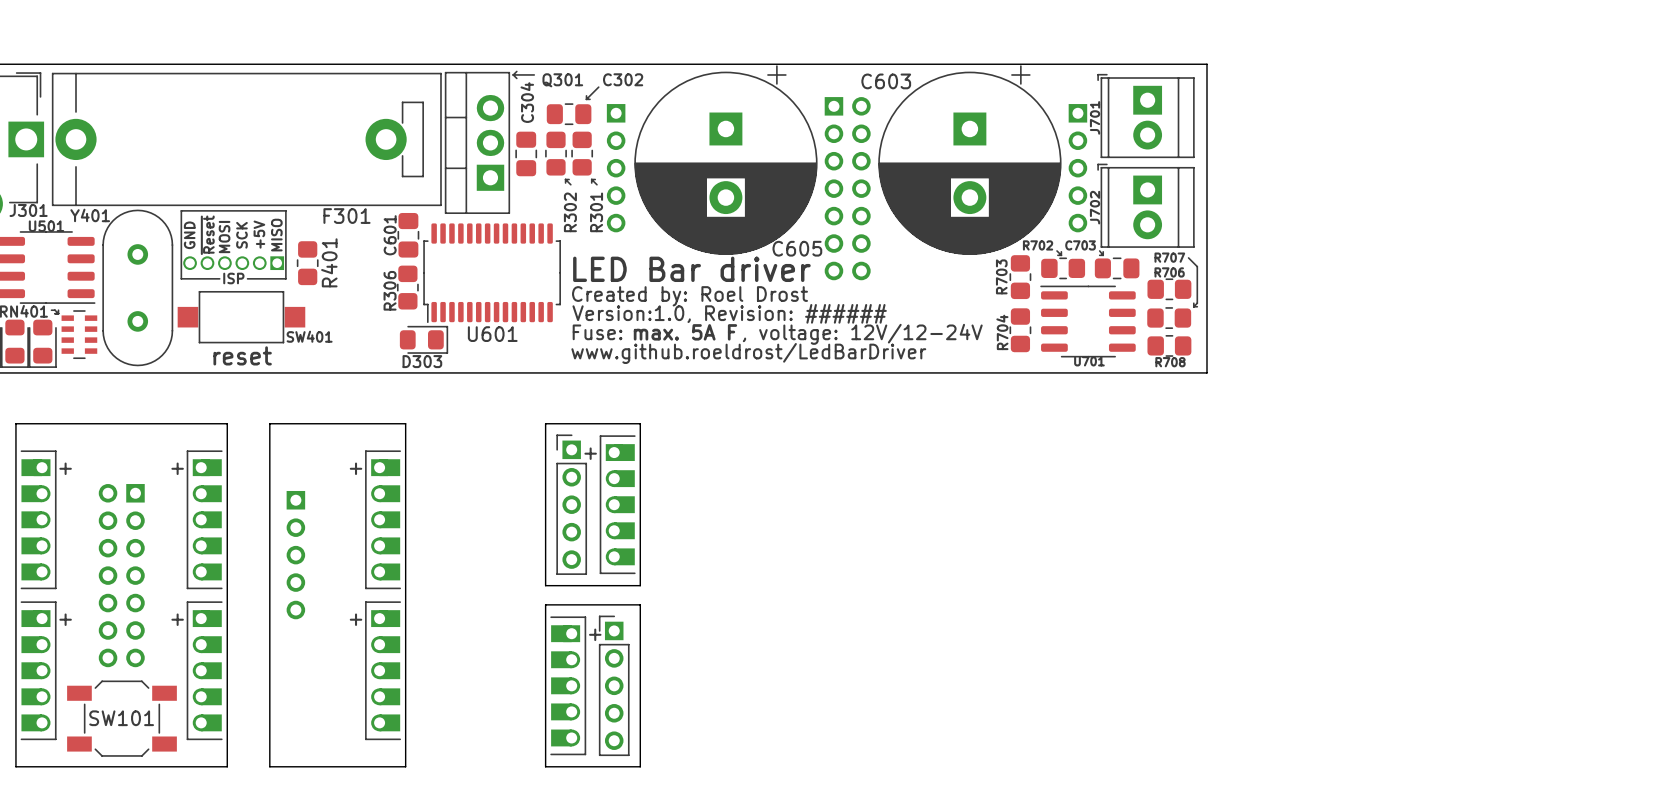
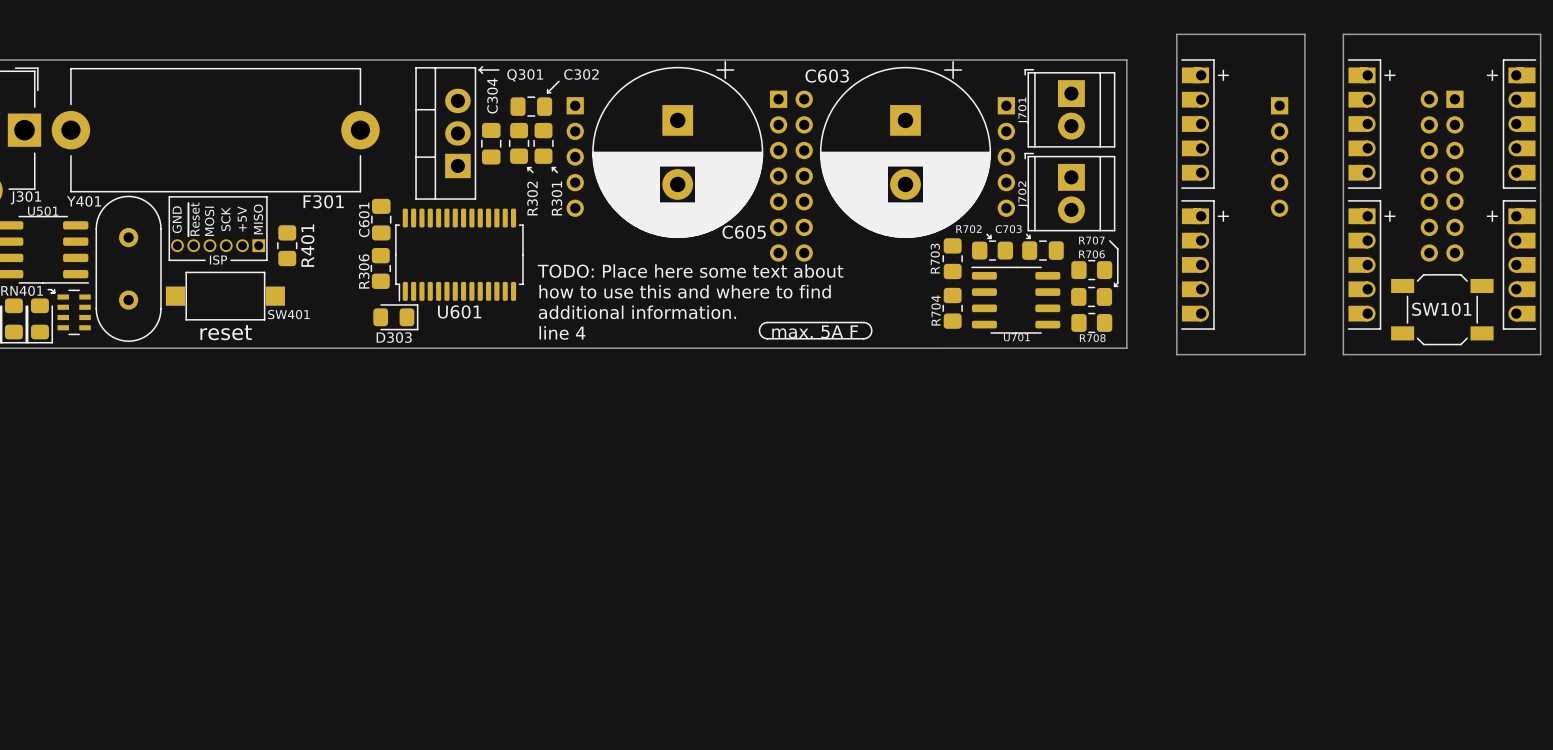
board edge: none -> (1176, 34) (1304, 34) (1304, 354) (1176, 354) (1176, 34)
board edge: none -> (1343, 34) (1540, 34) (1540, 354) (1343, 354) (1343, 34)
F301 footprint: [51, 72, 442, 207] -> [51, 67, 380, 193]
text: none -> + (1223, 75)
text: none -> + (1389, 75)
text: none -> + (1492, 75)
part: none -> (1197, 124)
part: none -> (1364, 124)
part: none -> (1519, 124)
part: none -> (1279, 157)
part: none -> (1442, 176)
text: none -> + (1223, 216)
text: none -> + (1389, 216)
text: none -> + (1492, 216)
text: LED Bar driver (691, 269) -> none
part: none -> (1197, 264)
part: none -> (1364, 264)
part: none -> (1519, 264)
text: Created by: Roel Drost (690, 296) -> TODO: Place here some text about (690, 271)
text: Version:1.0, Revision: ###### (729, 313) -> how to use this and where to find (685, 291)
text: Fuse: (597, 332) -> additional information. (637, 312)
F301 value position: max. 5A F (685, 332) -> max. 5A F (815, 331)
text: , voltage: 12V/12-24V (862, 334) -> none
line: none -> (767, 322) (864, 322) (870, 325) (871, 331) (869, 336) (864, 338) (766, 338) (761, 335) (759, 329) (761, 324) (767, 322)
text: www.github.roeldrost/LedBarDriver (748, 353) -> line 4 (562, 332)
board edge: (15, 423) (227, 423) (227, 766) (15, 766) (15, 423) -> none
board edge: (269, 423) (405, 423) (405, 766) (269, 766) (269, 423) -> none
board edge: (545, 423) (545, 585) (640, 585) (640, 423) (545, 423) -> none
part: (571, 504) -> none
part: (617, 504) -> none
part: (38, 519) -> none
part: (204, 519) -> none
part: (383, 519) -> none
part: (295, 555) -> none
part: (121, 575) -> none
board edge: (545, 604) (545, 766) (640, 766) (640, 604) (545, 604) -> none
part: (38, 670) -> none
part: (204, 670) -> none
part: (383, 670) -> none
part: (568, 685) -> none
part: (614, 685) -> none
SW101 position: (121, 718) -> (1442, 309)

